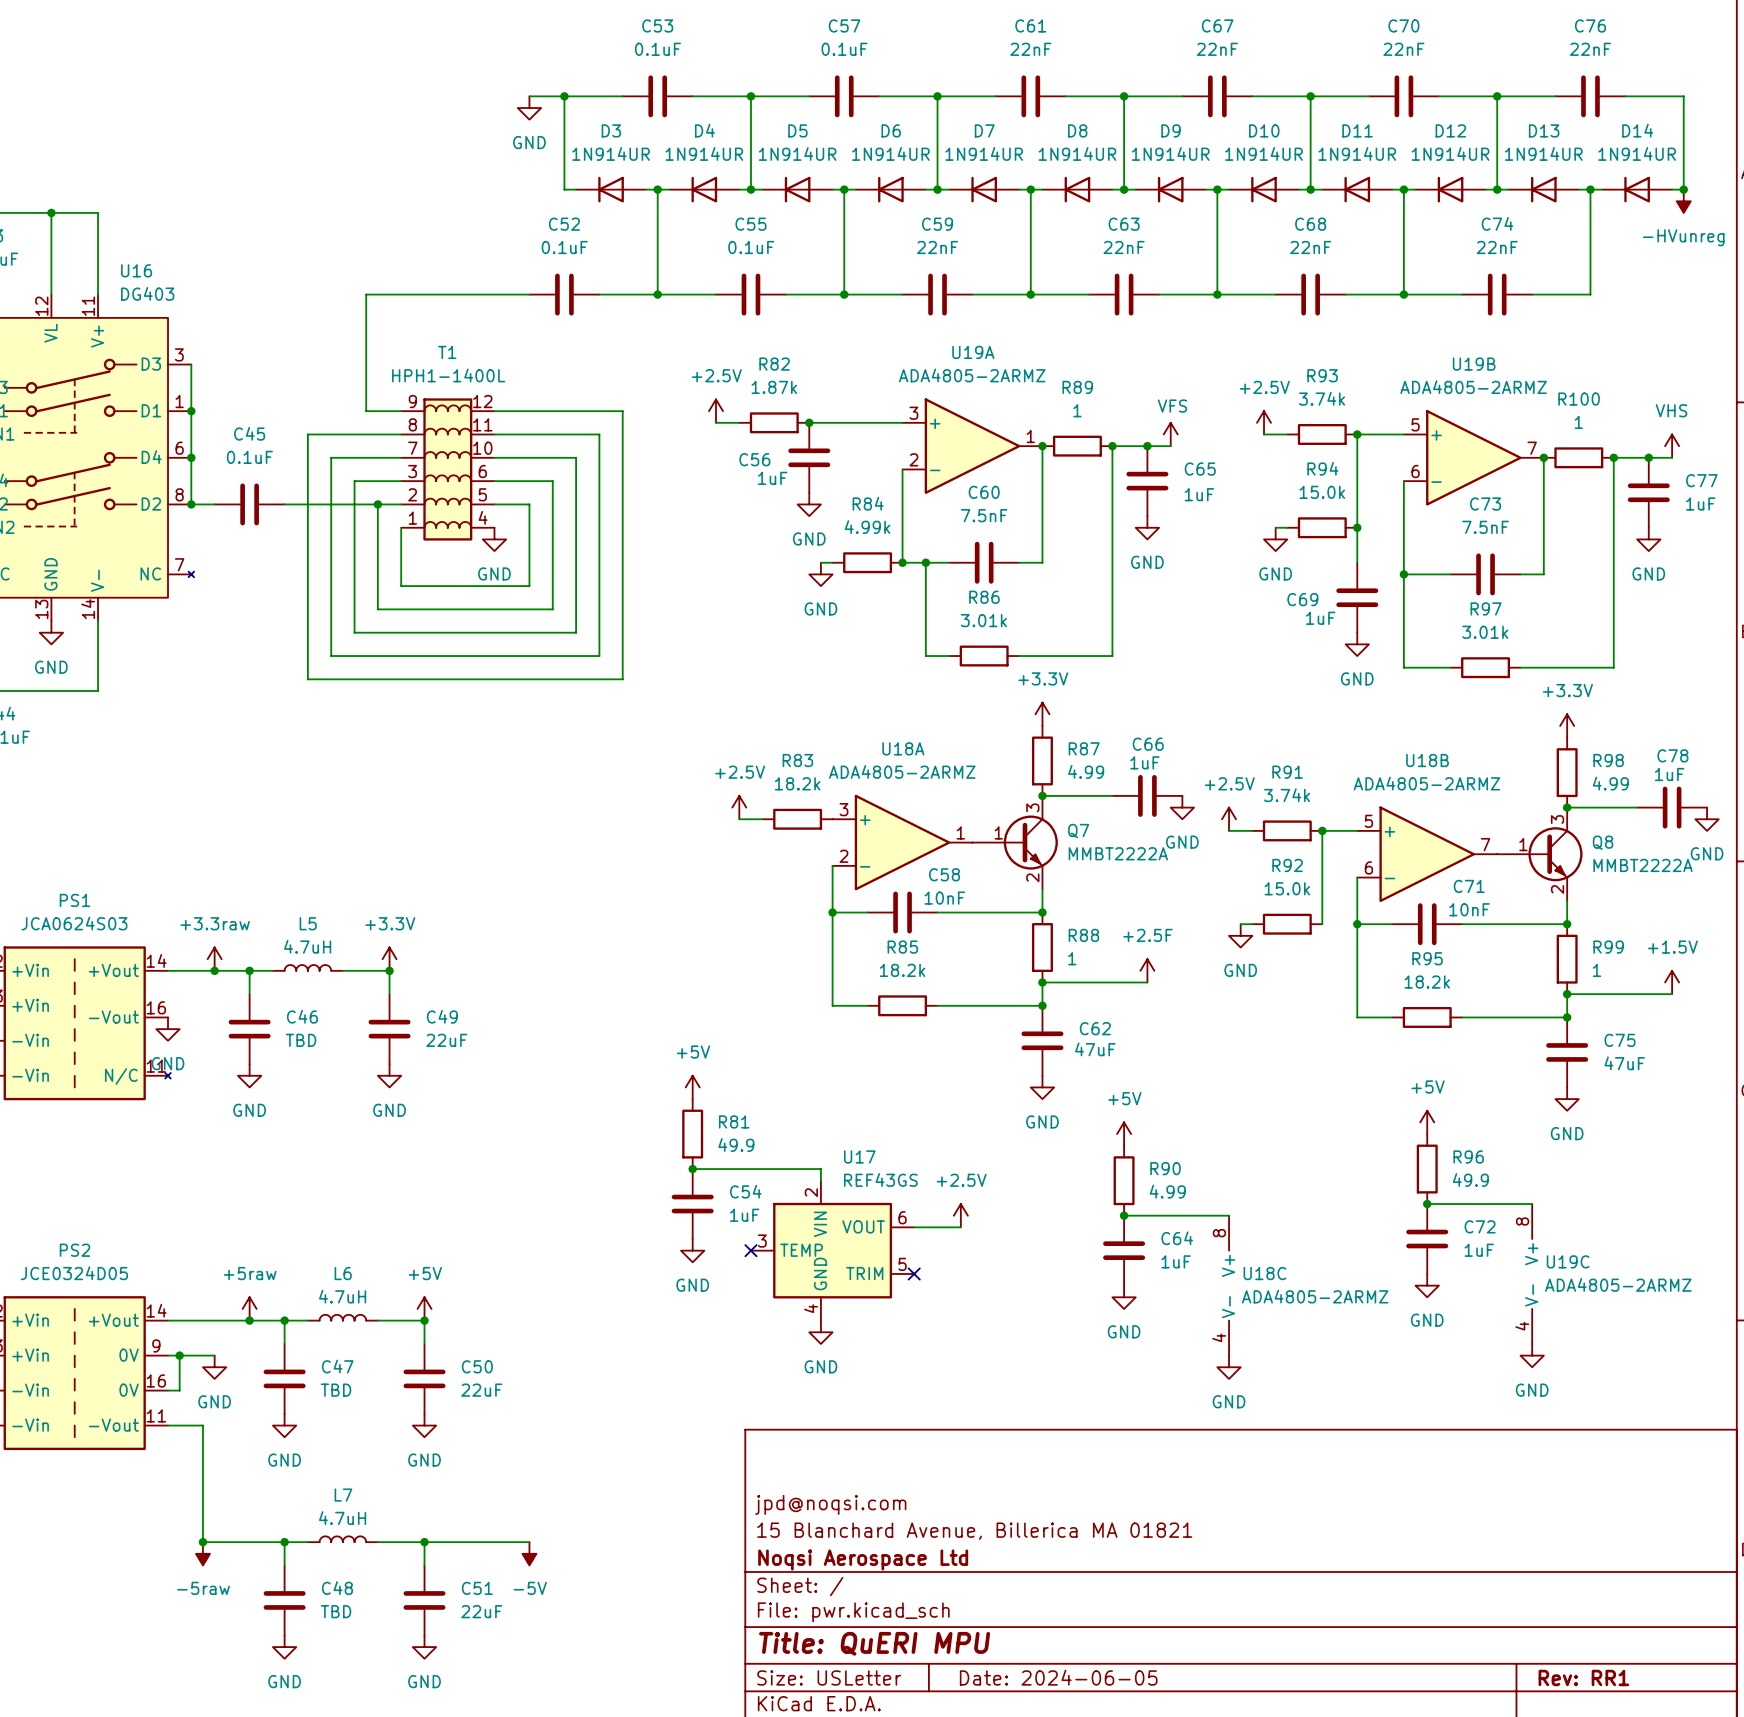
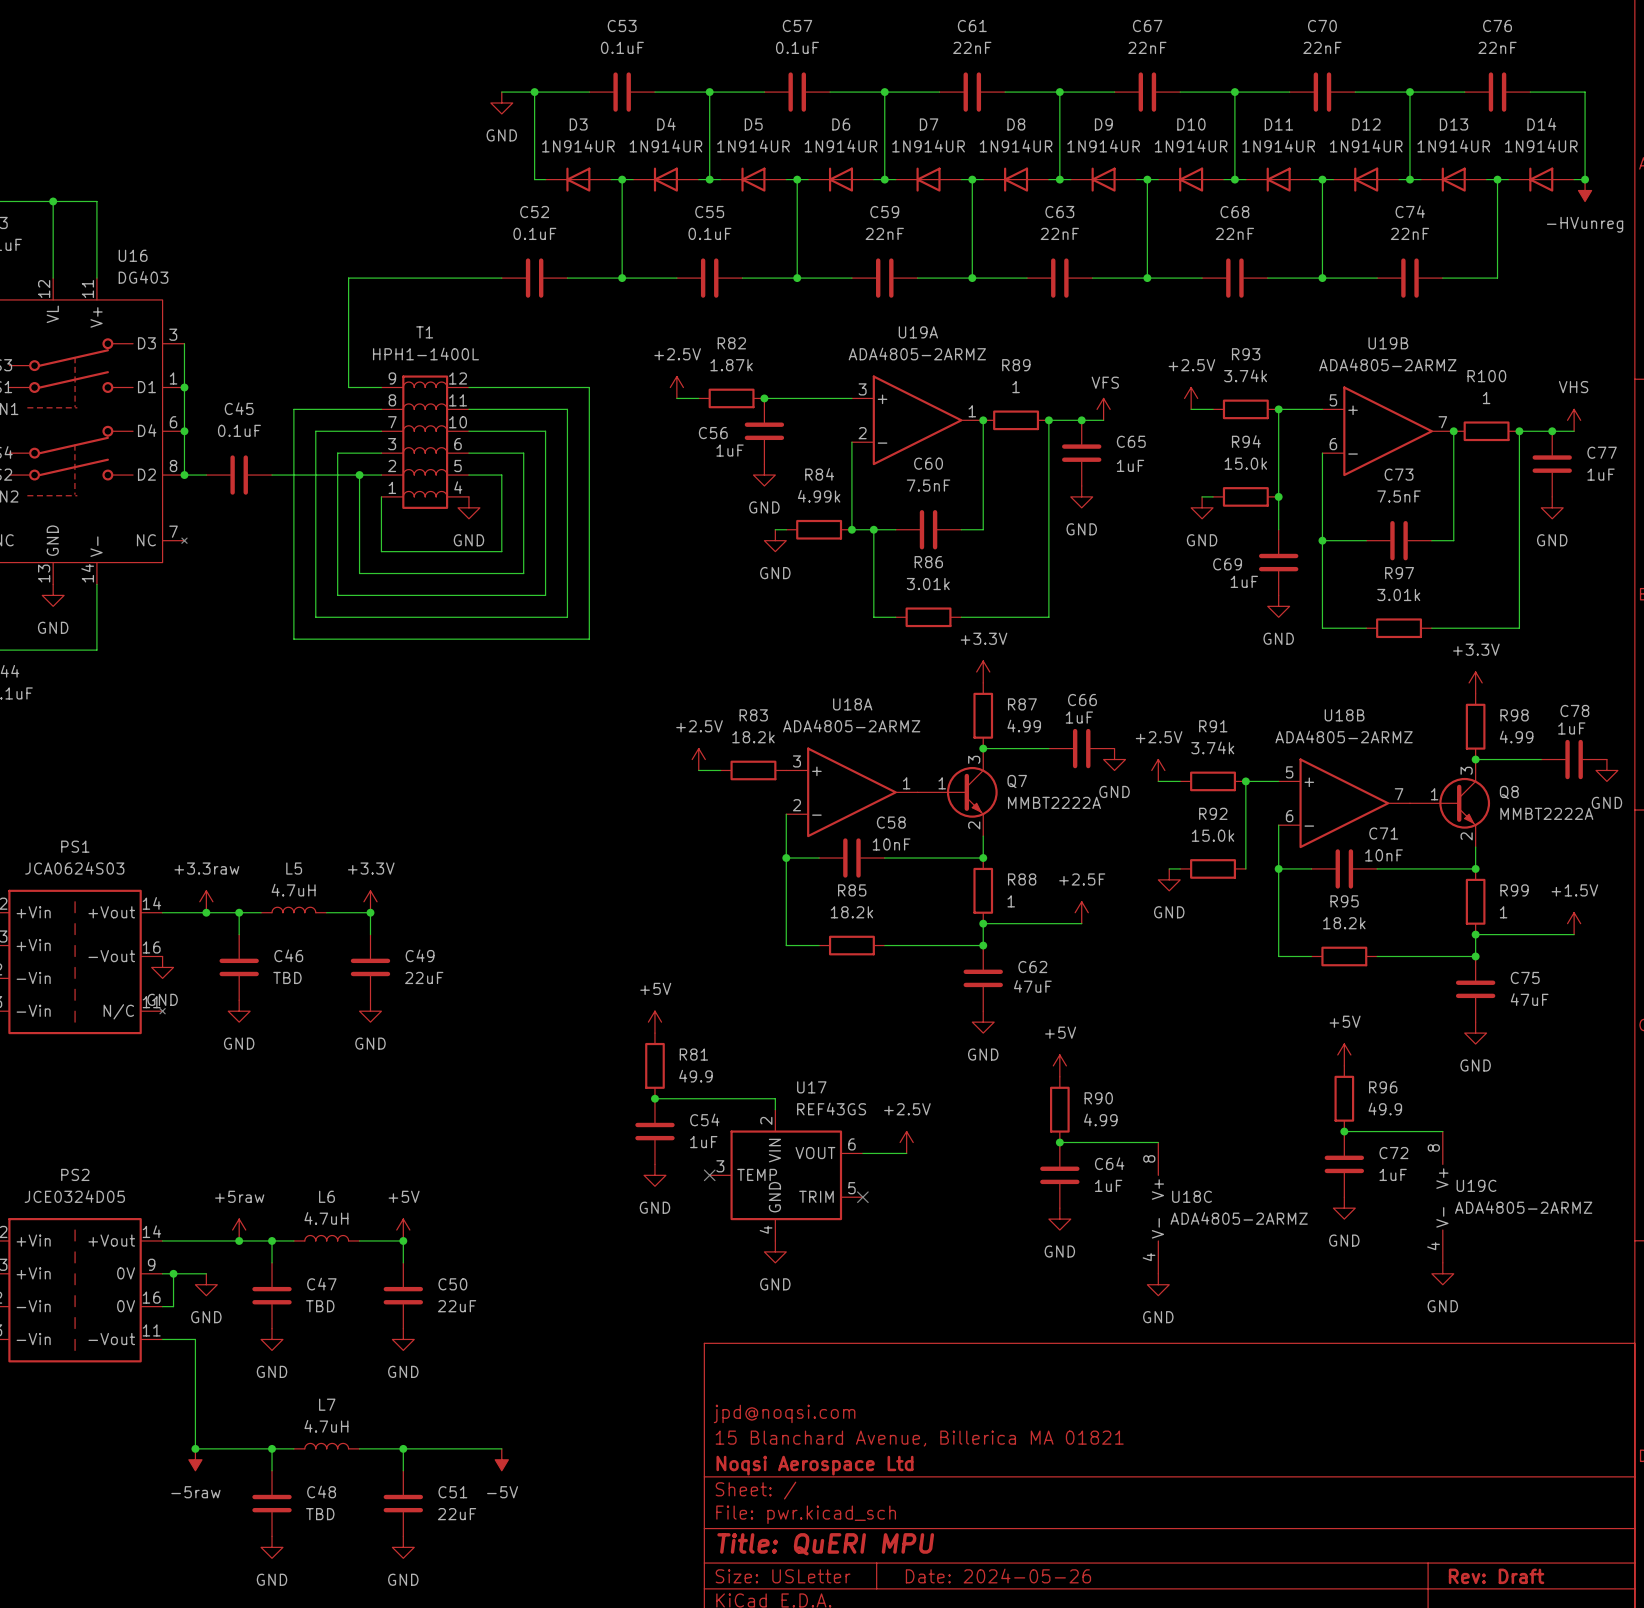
title block: Date: 2024-06-05 (1058, 1677) -> Date: 2024-05-26 (998, 1576)
title block: Rev: RR1 (1583, 1677) -> Rev: Draft (1496, 1576)

